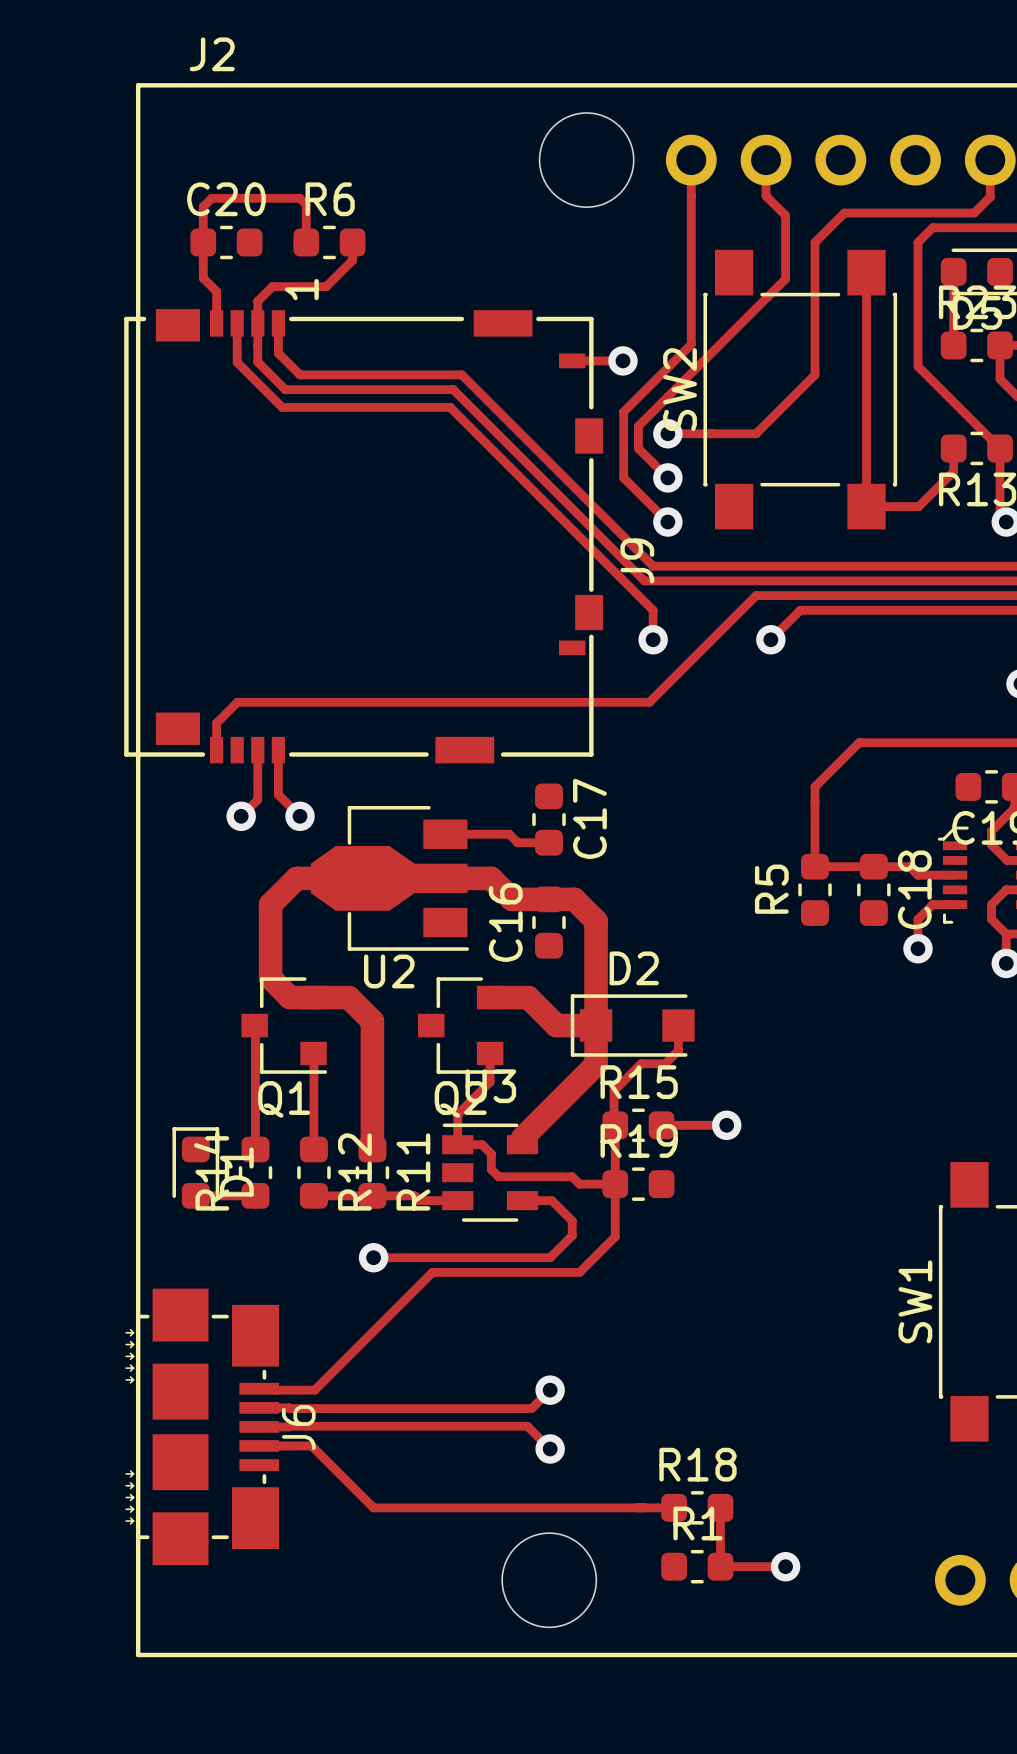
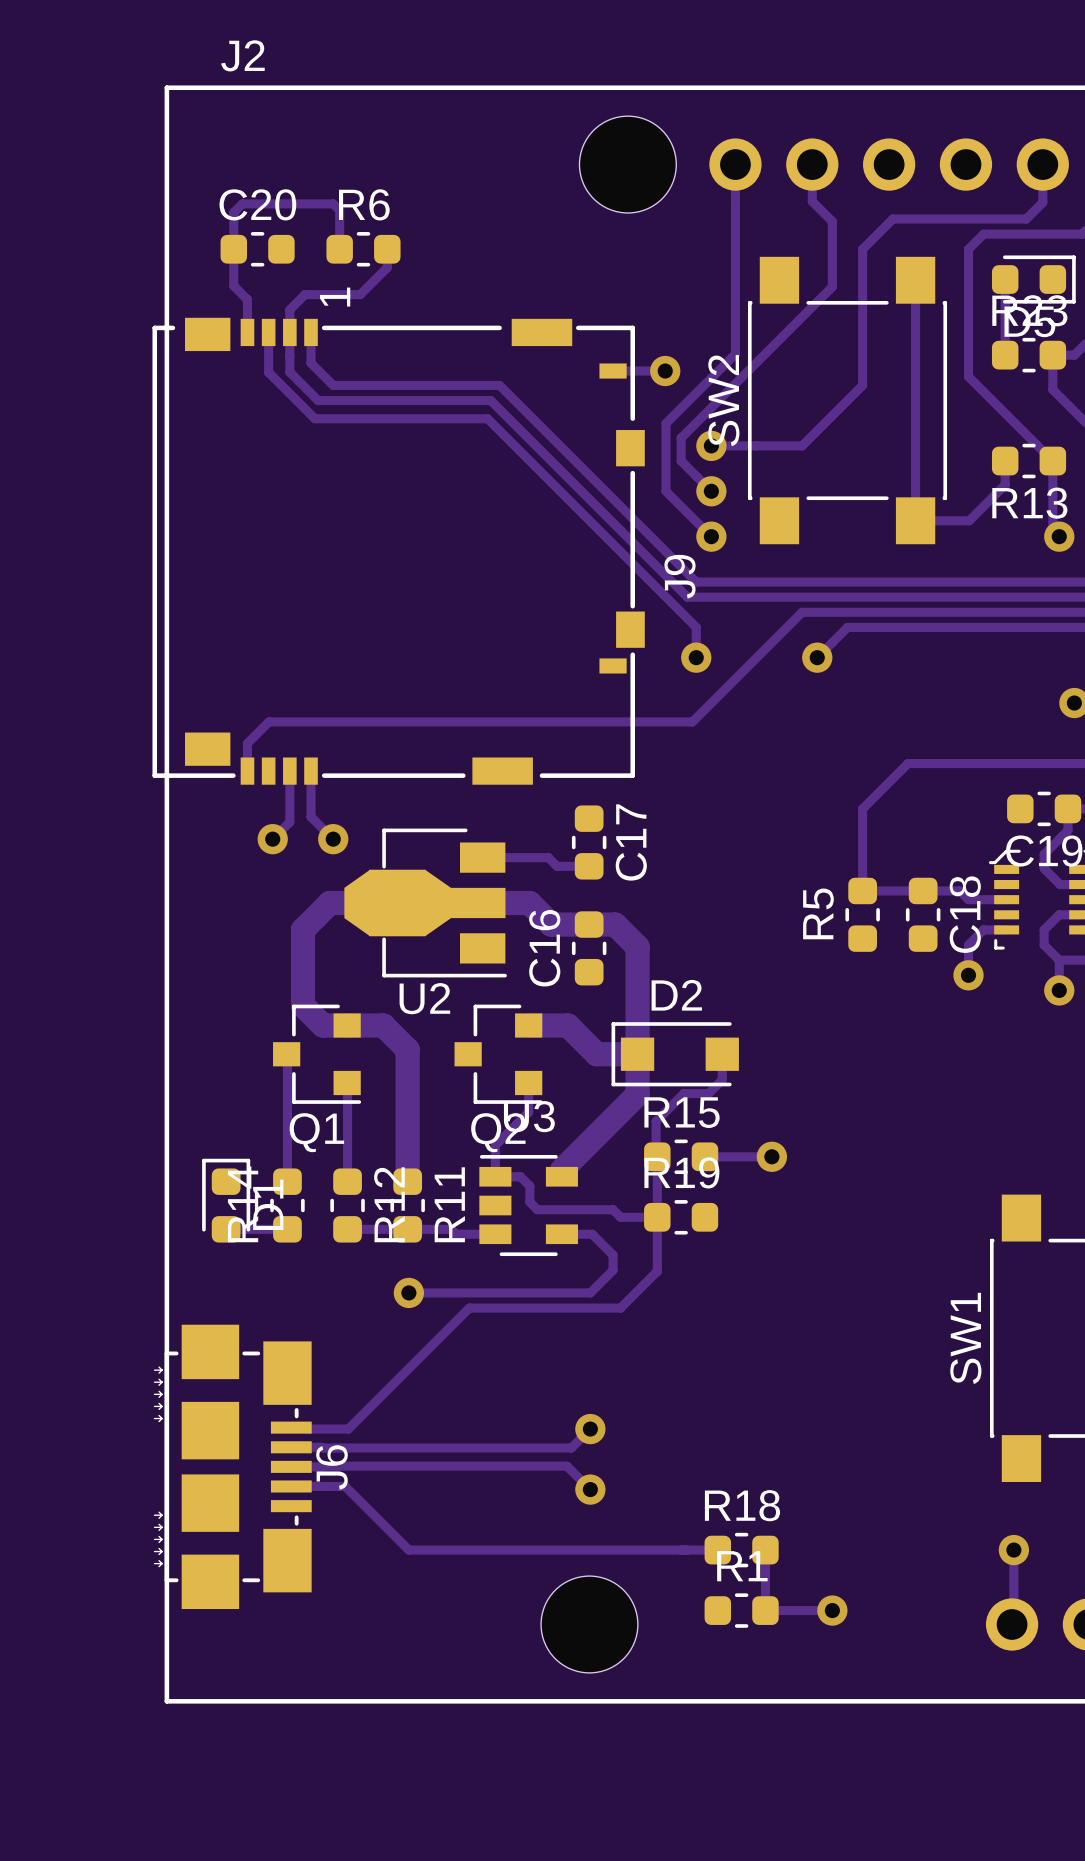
track: none -> (1013, 1550) (1013, 1622) (1012, 1624)
via: none -> (1013, 1550)

